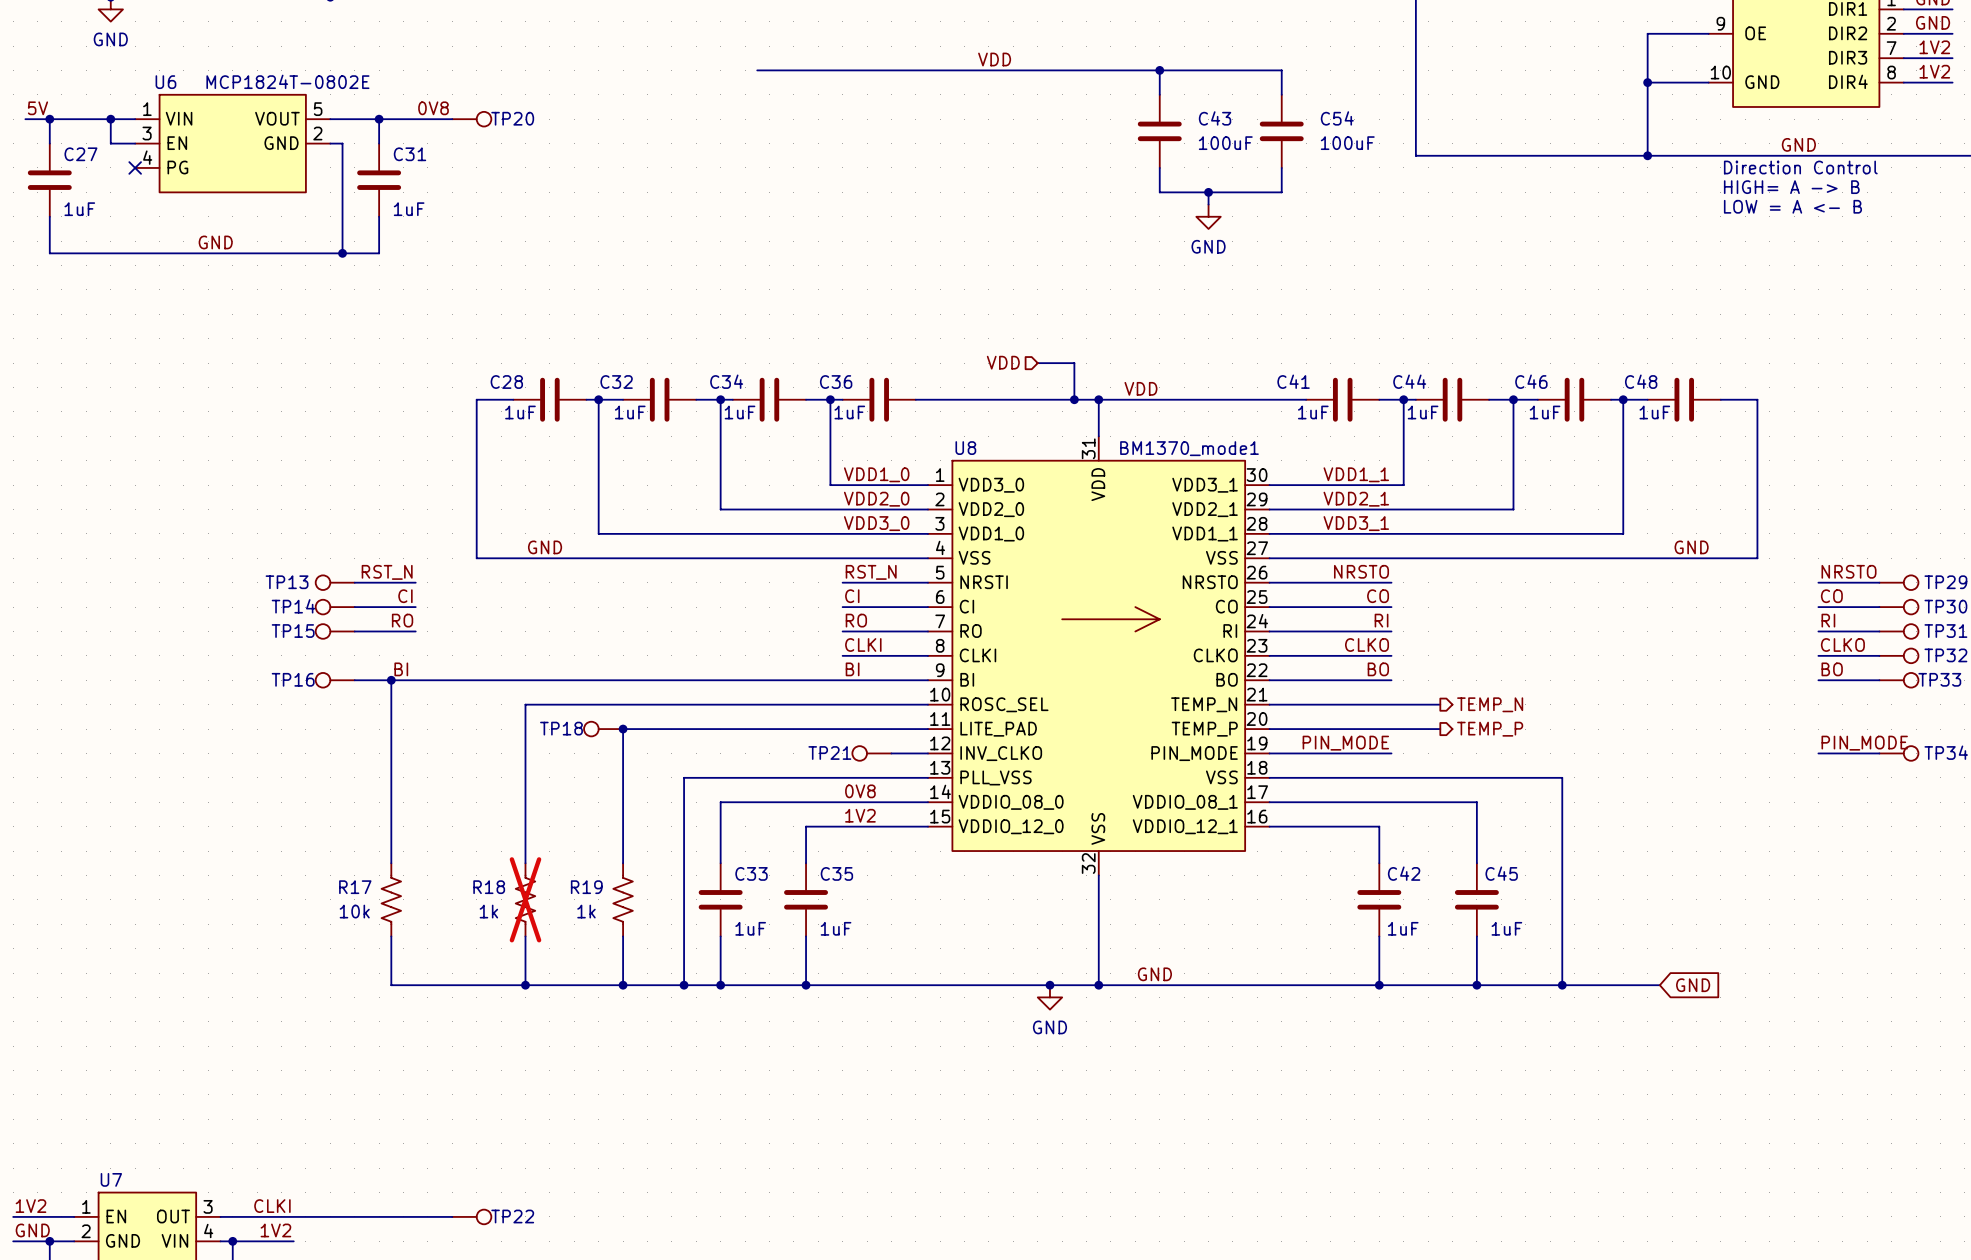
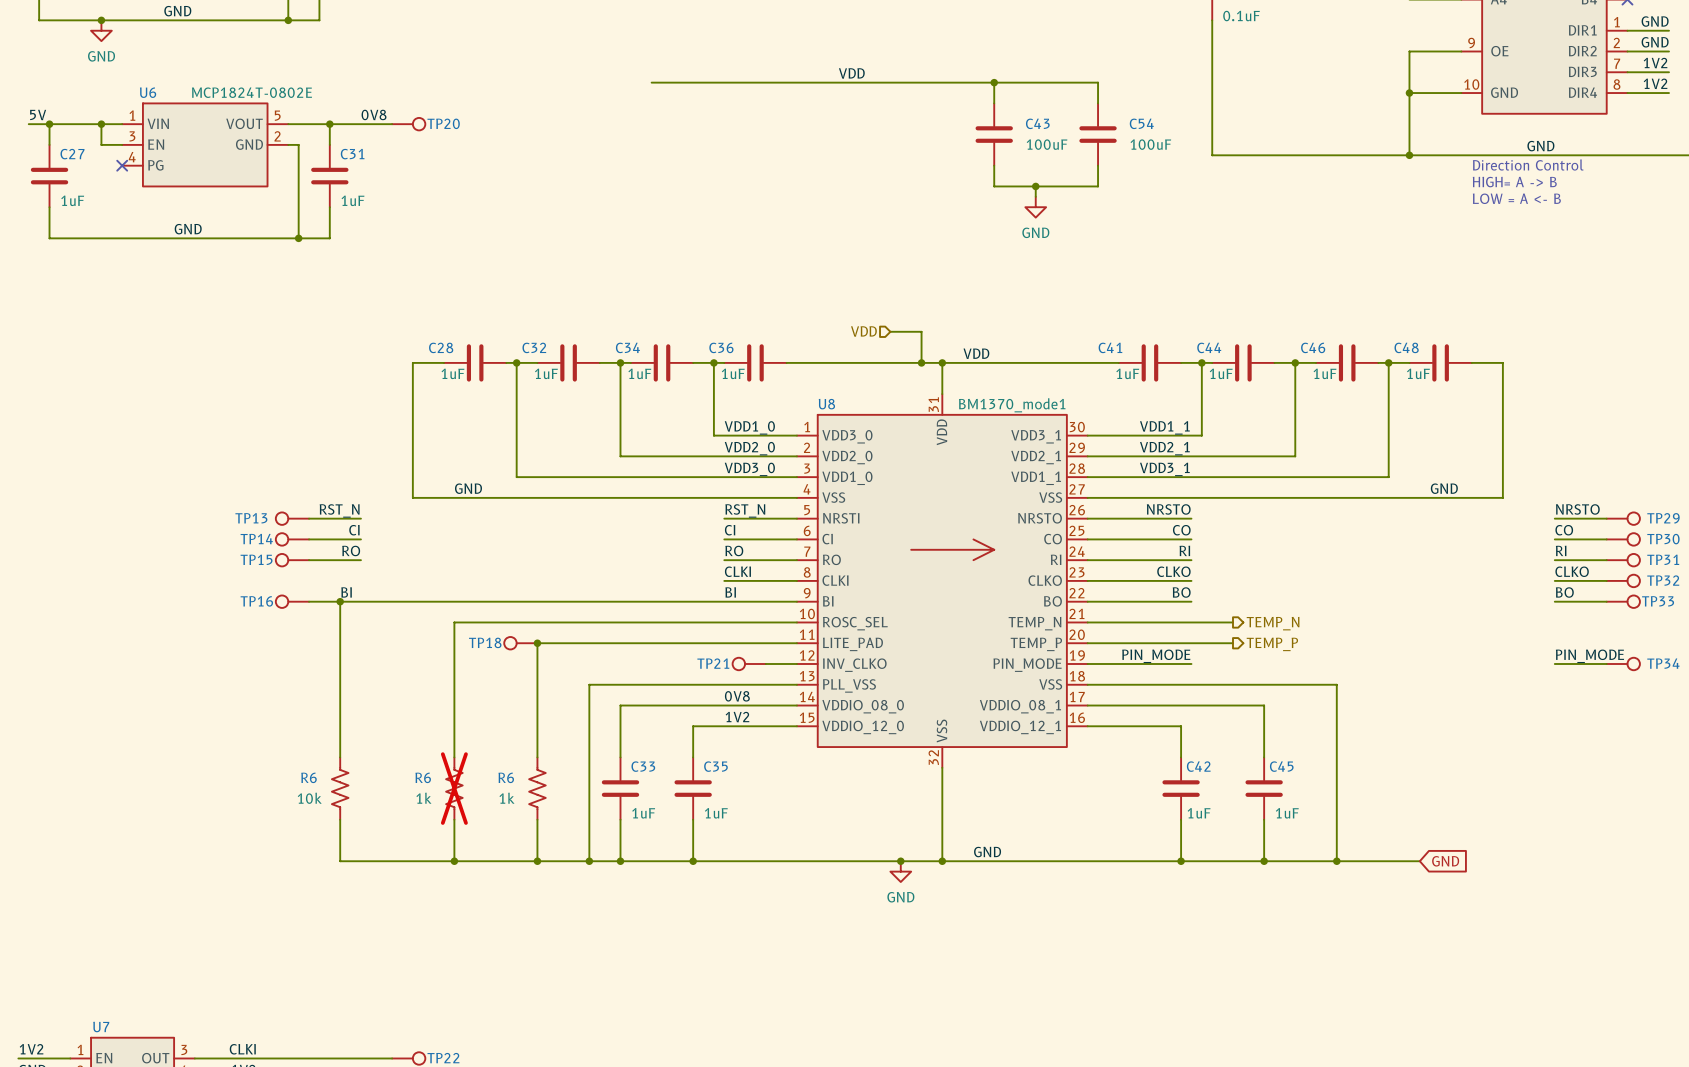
R17 name: R17 (355, 887) -> R6 (308, 777)
R18 name: R18 (489, 887) -> R6 (423, 777)
R19 name: R19 (586, 887) -> R6 (506, 777)

